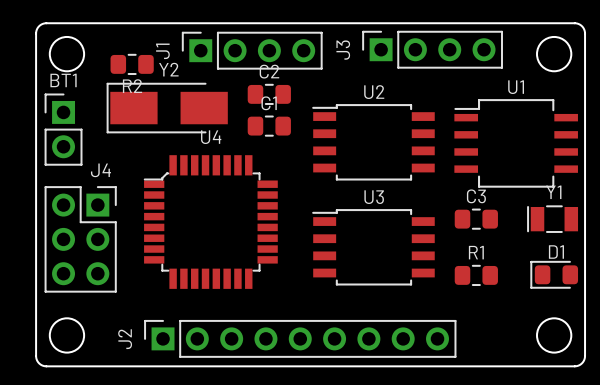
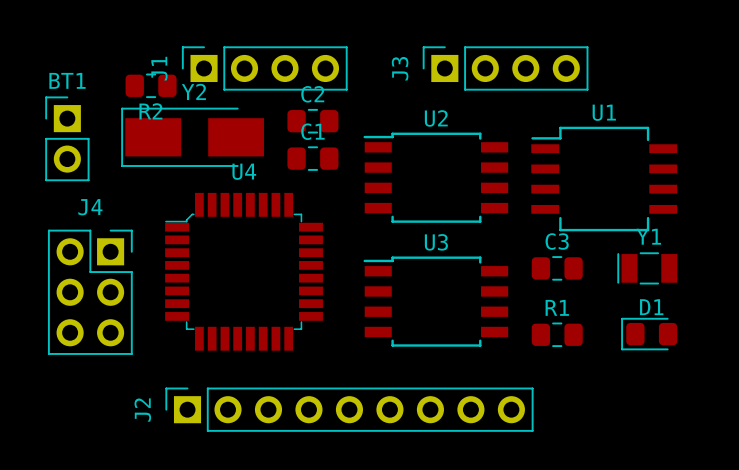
board edge: (46, 23) (579, 24) (585, 33) (583, 361) (574, 366) (41, 364) (36, 356) (36, 33) (39, 26) (46, 23) -> none
round board edge: [49, 36, 85, 72] -> none
round board edge: [536, 36, 572, 72] -> none
J1 position: (252, 50) -> (264, 68)
BT1 position: (63, 129) -> (67, 138)
J4 name position: J4 (100, 170) -> J4 (90, 207)
round board edge: [49, 317, 85, 353] -> none
round board edge: [536, 317, 572, 353] -> none

